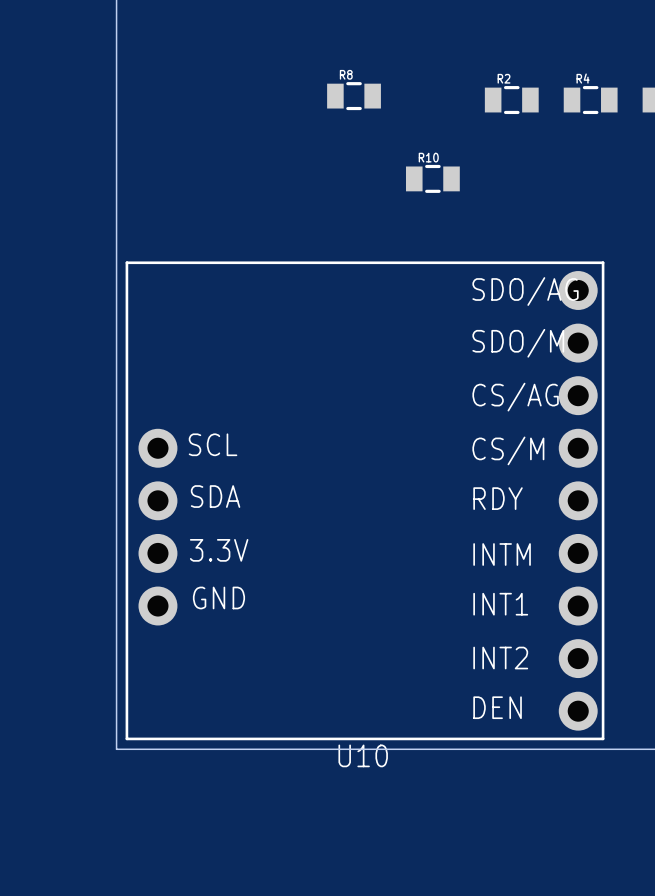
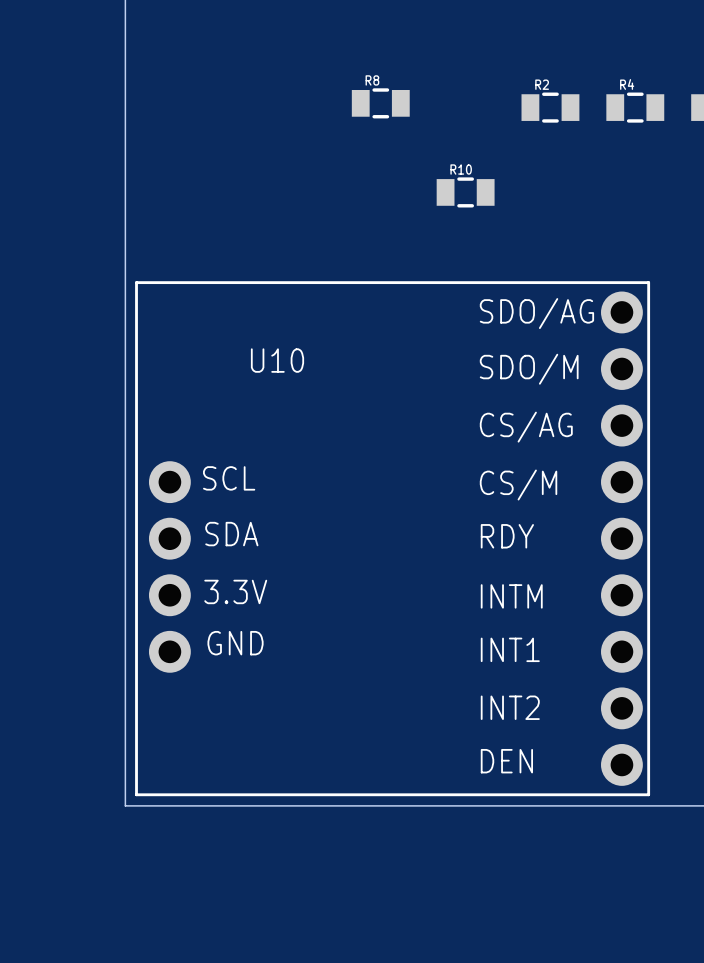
U10 footprint: [125, 261, 605, 741] -> [135, 281, 651, 797]
U10 name position: U10 (363, 755) -> U10 (277, 360)

